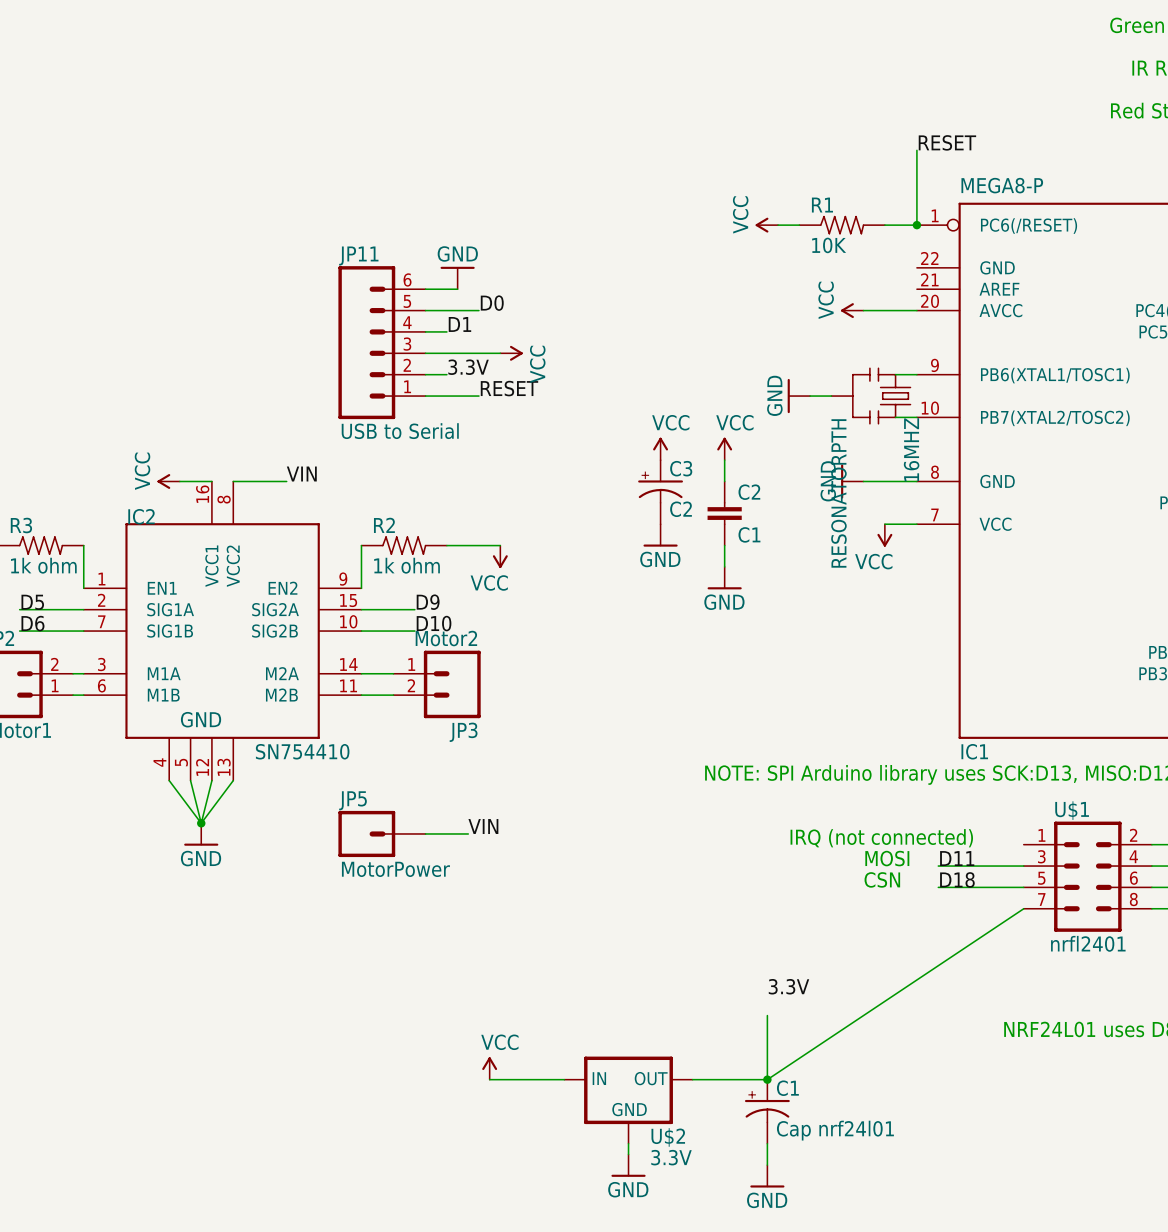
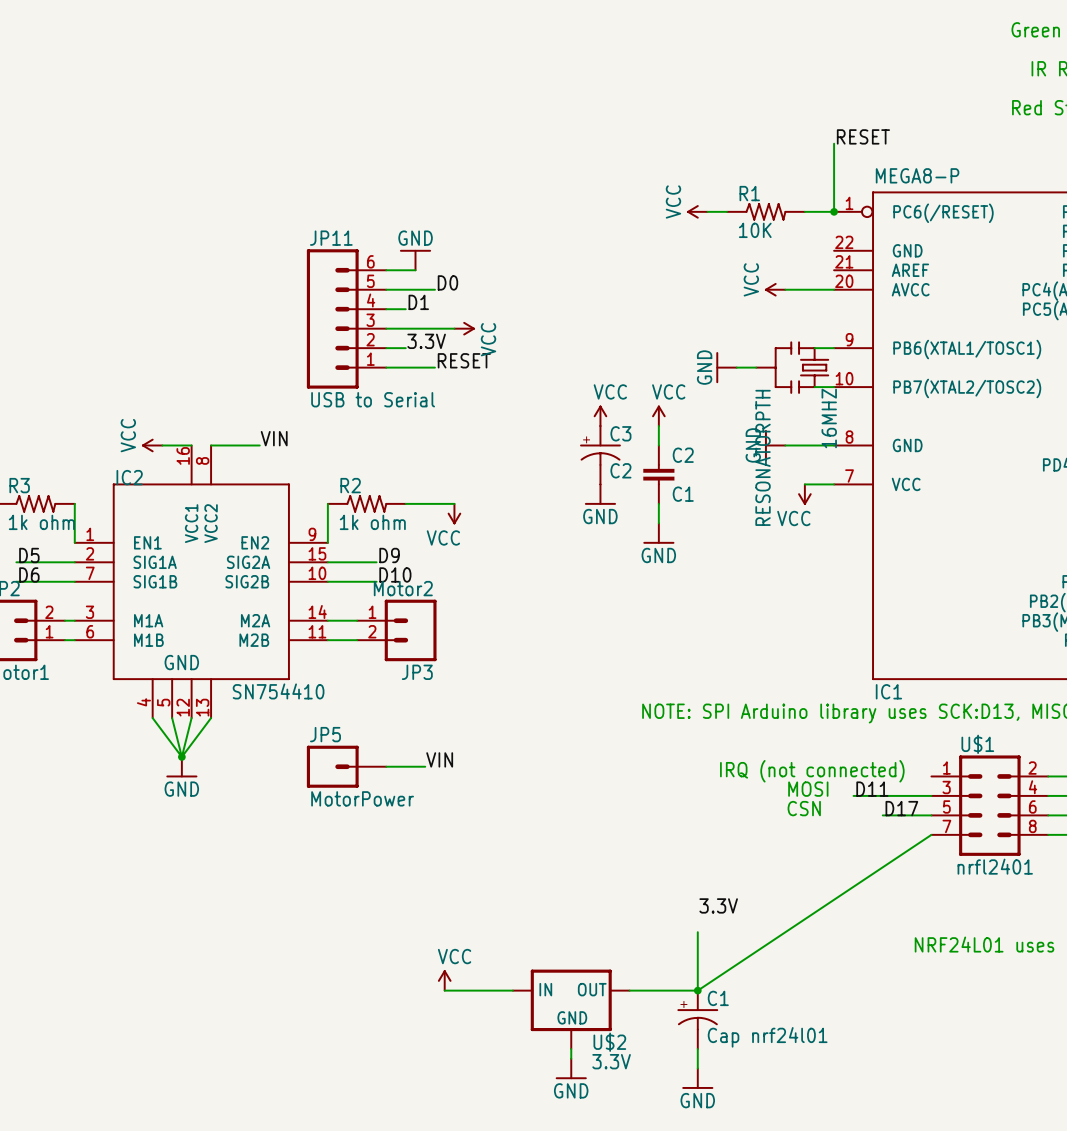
label: D18 (957, 879) -> D17 (901, 808)
wire: (938, 887) (970, 887) -> none

